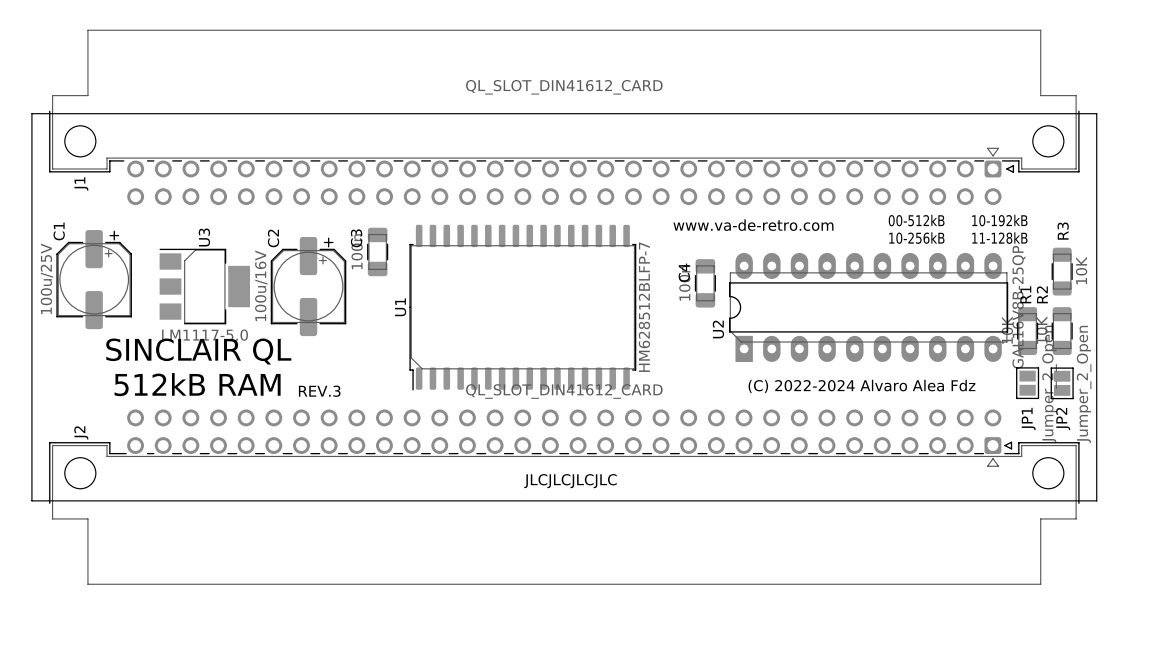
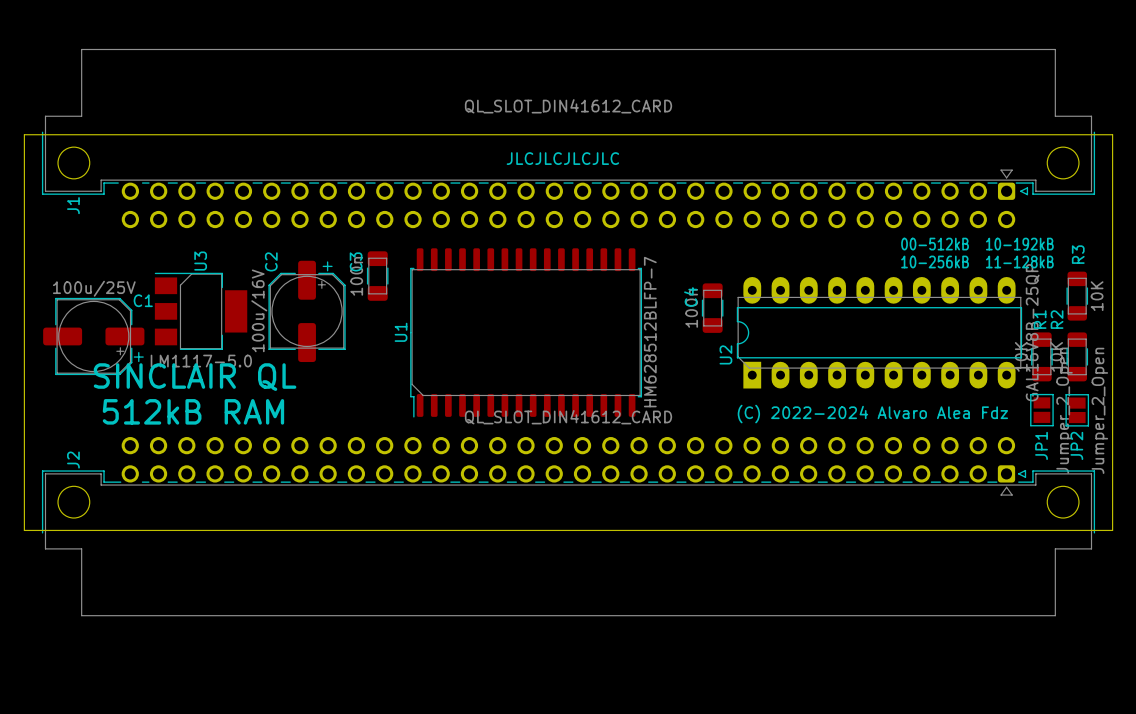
text: none -> JLCJLCJLCJLC (562, 158)
text: www.va-de-retro.com (753, 225) -> none
C1 footprint: [56, 230, 132, 330] -> [43, 297, 145, 376]
C1 name position: C1 (59, 231) -> C1 (143, 300)
C1 value position: 100u/25V (46, 278) -> 100u/25V (94, 288)
text: REV.3 (319, 391) -> none
text: JLCJLCJLCJLC (570, 481) -> none

